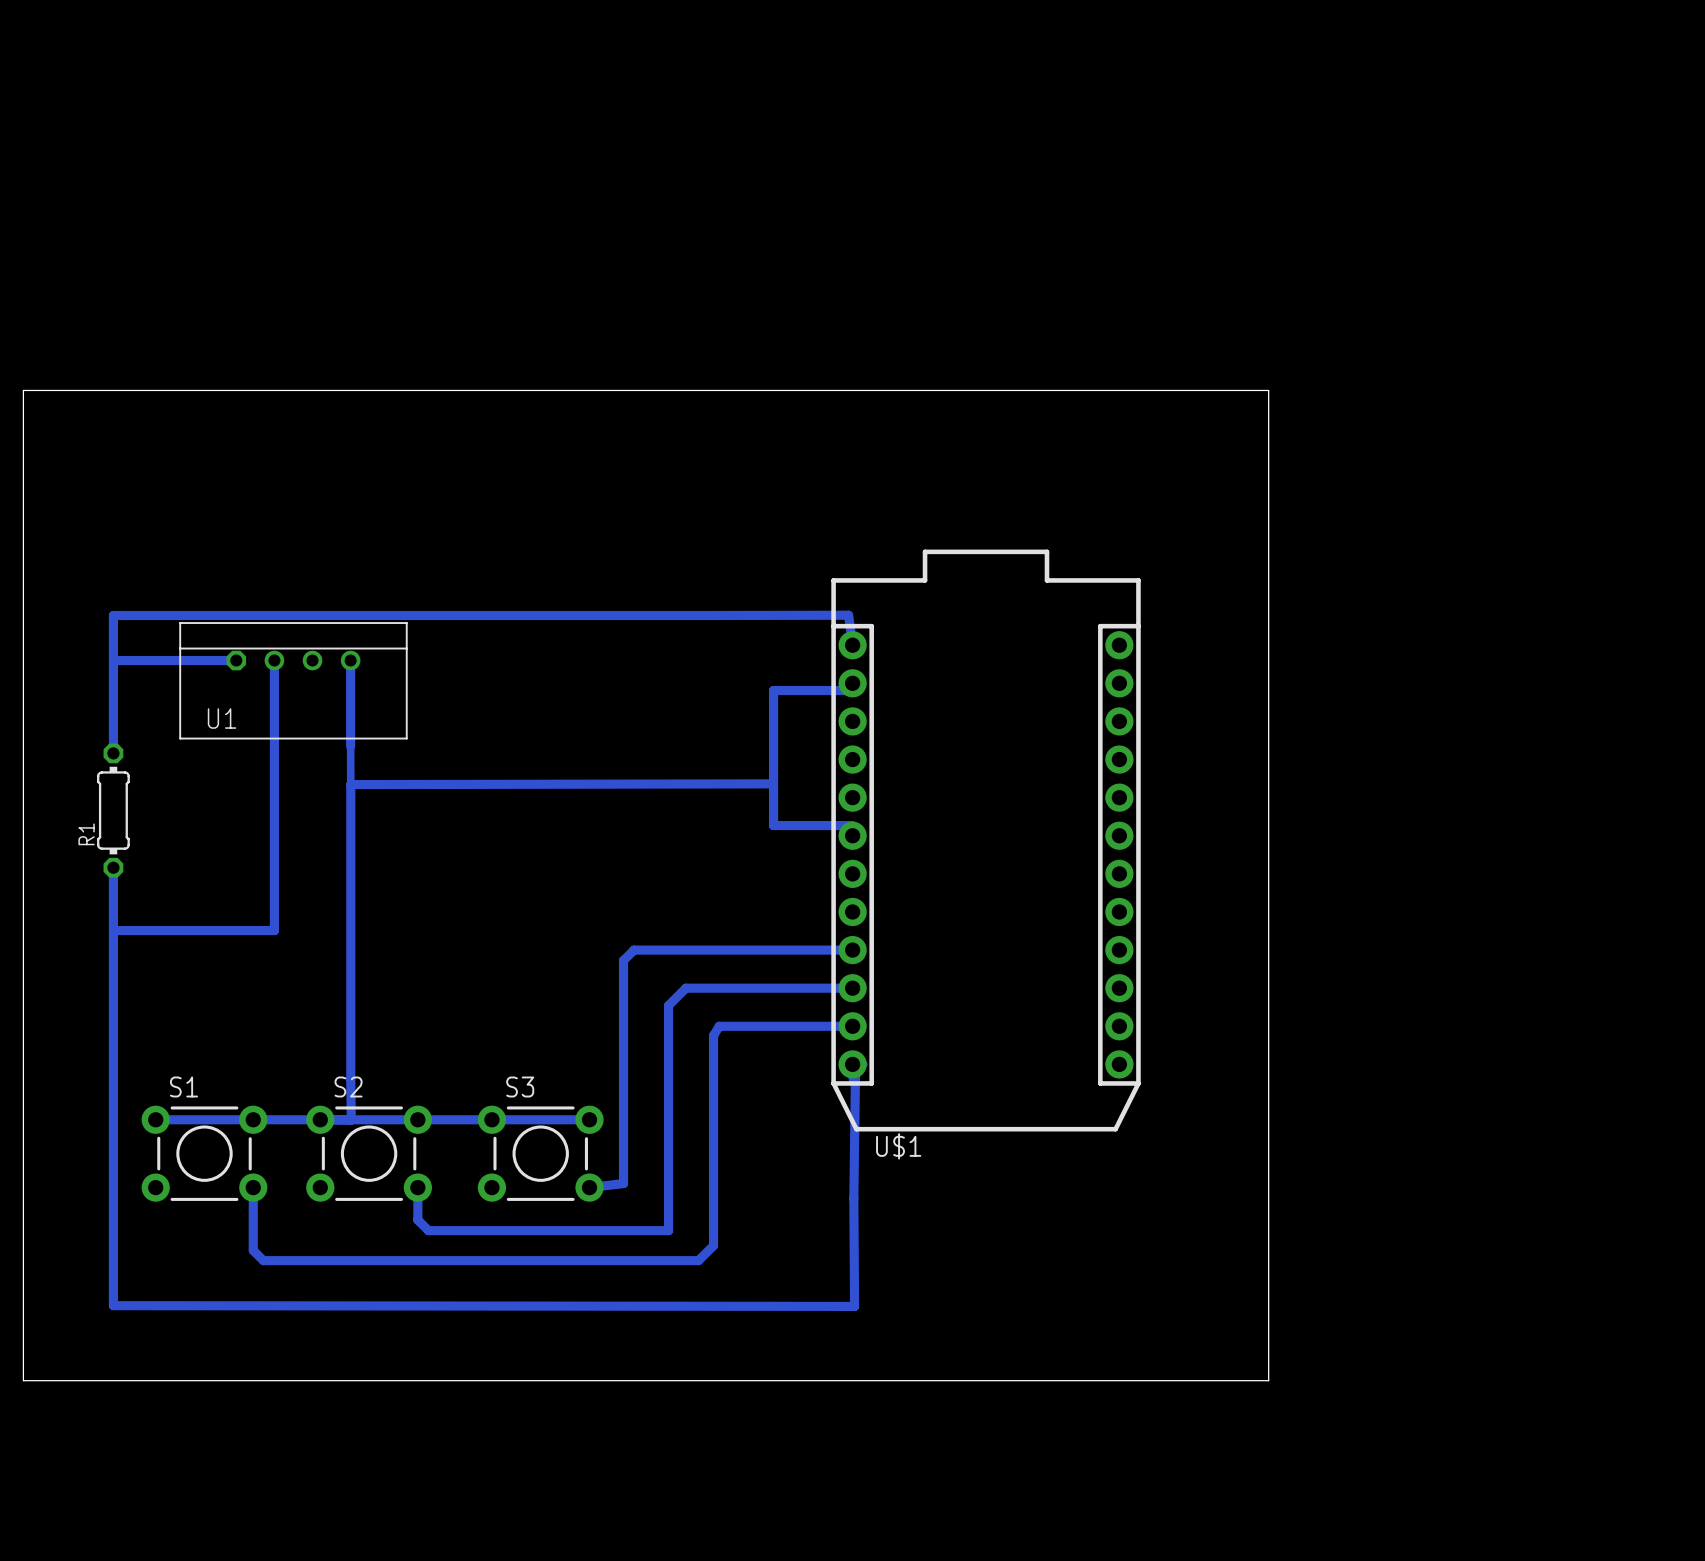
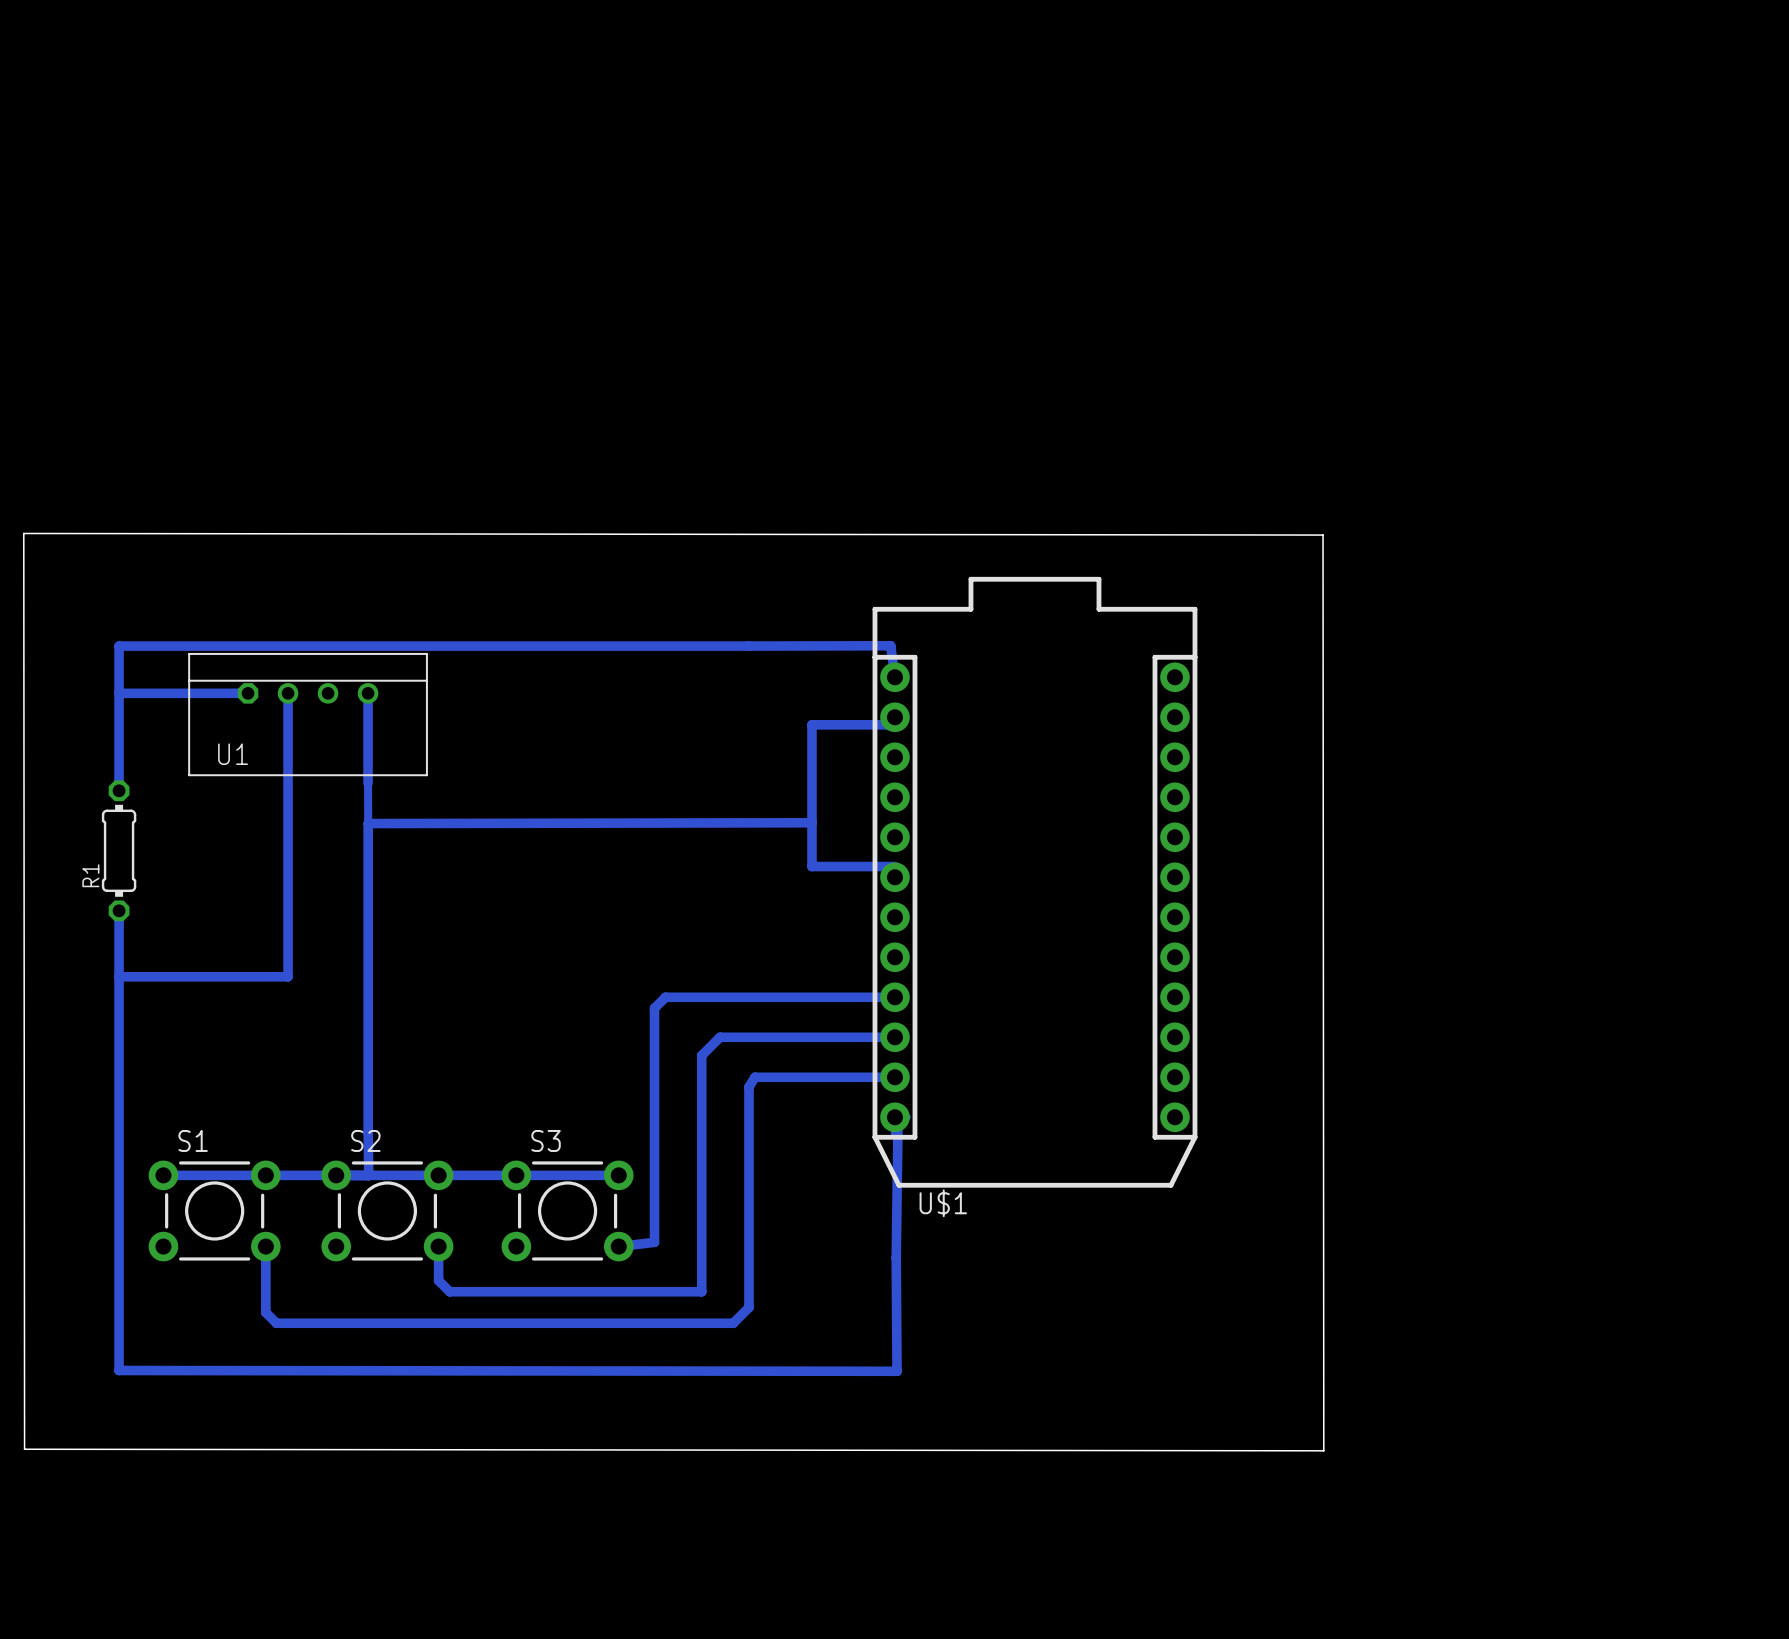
board edge: (23, 390) (1268, 390) (1268, 1380) (23, 1380) (23, 390) -> (23, 533) (24, 1449) (1323, 1450) (1323, 535) (23, 533)

